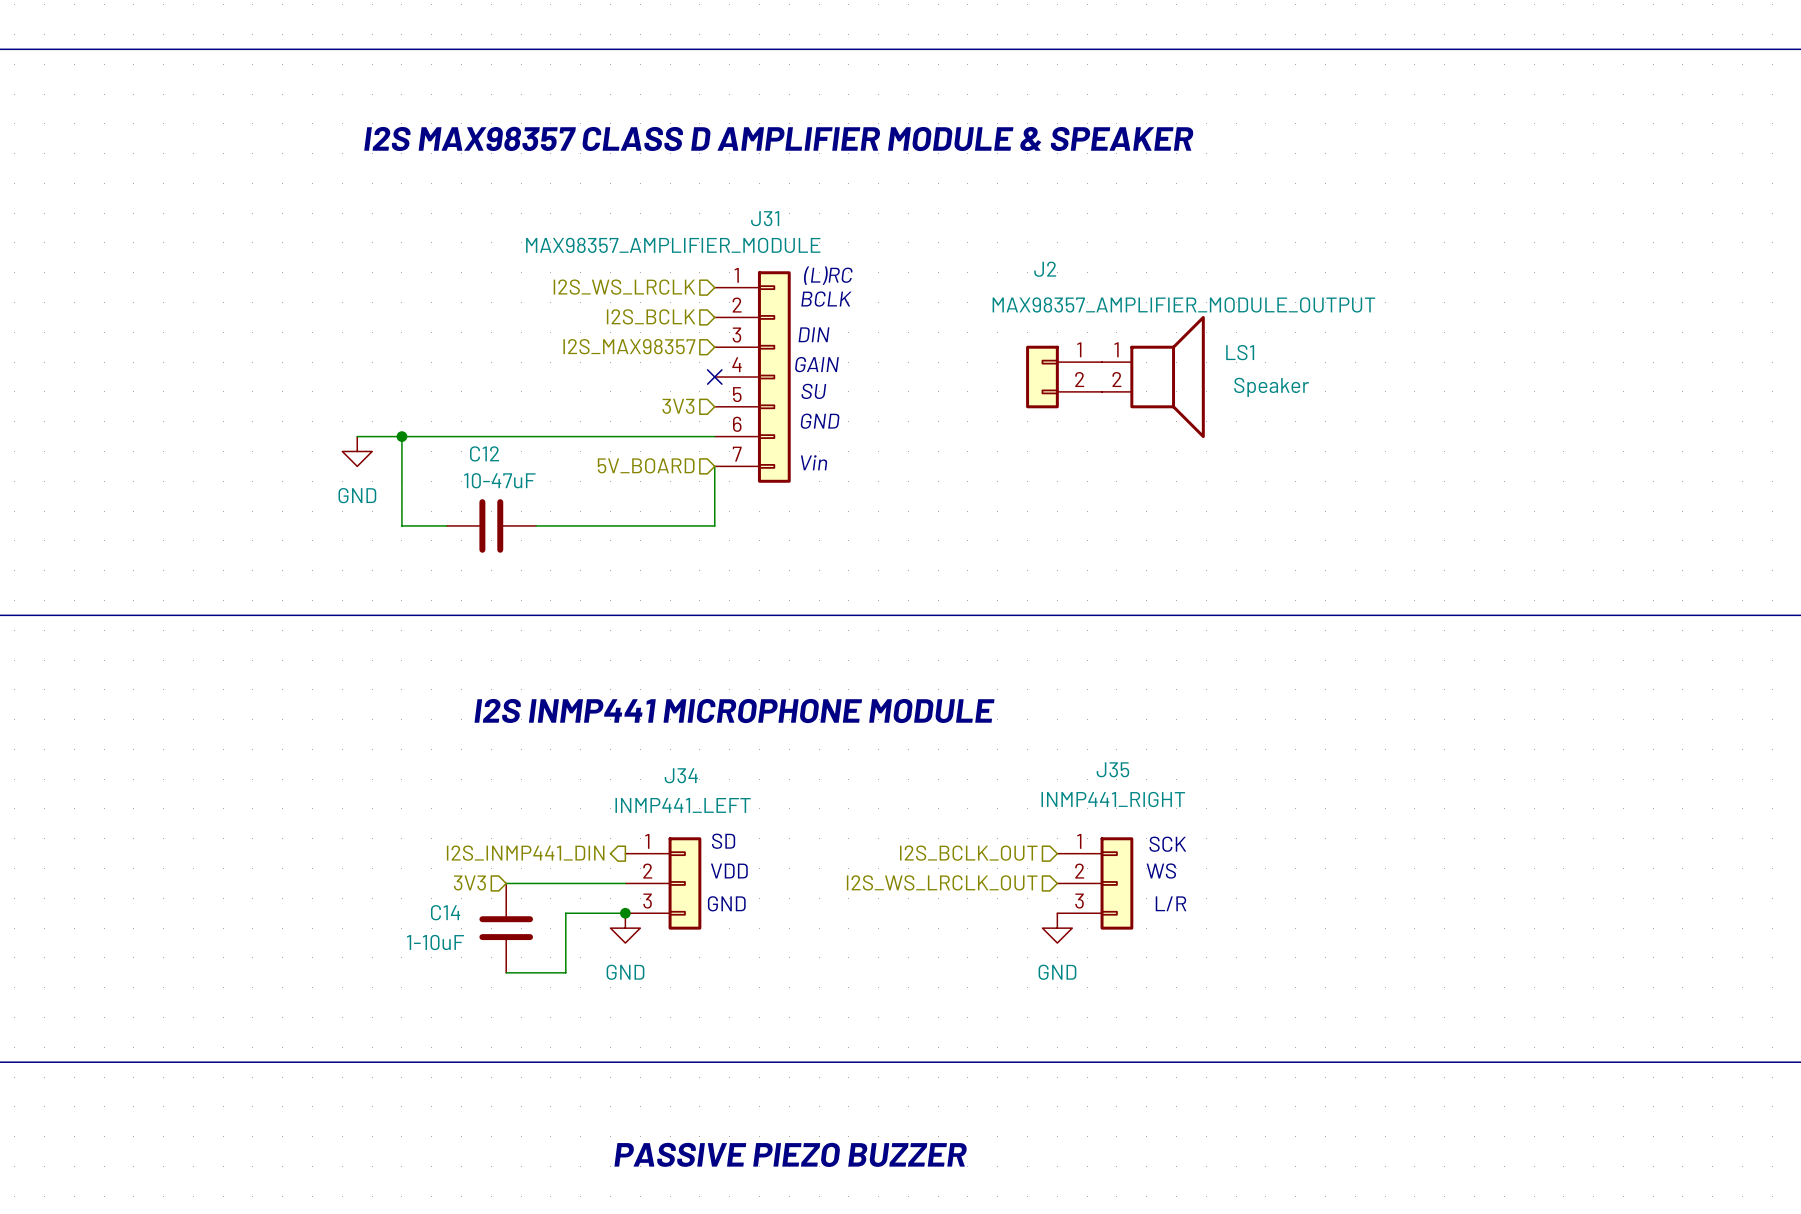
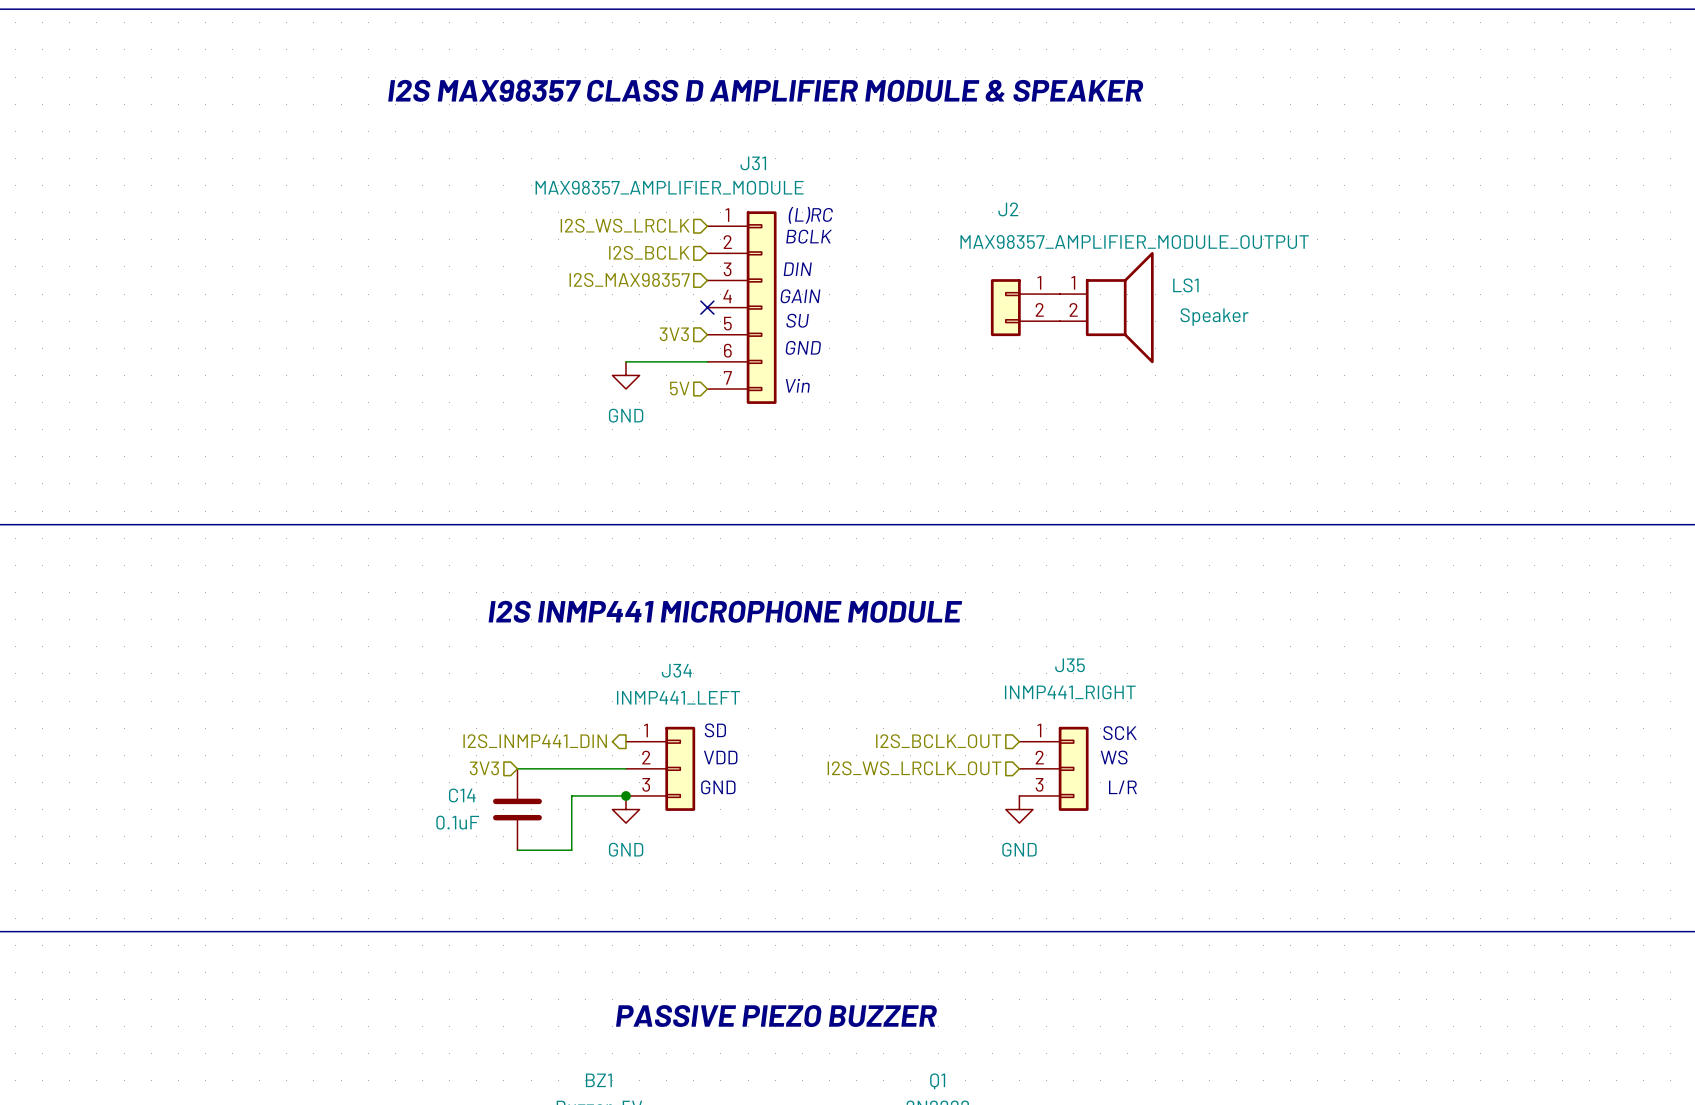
wire: (357, 436) (625, 436) -> none
wire: (401, 436) (401, 525) (446, 525) -> none
junction: (401, 436) -> none
power symbol position: GND (357, 451) -> GND (625, 375)
hierarchical label: 5V_BOARD (646, 465) -> 5V (679, 388)
wire: (714, 466) (714, 525) (536, 525) -> none
C12: 10-47uF (491, 525) -> none
C14 value: 1-10uF (435, 942) -> 0.1uF (457, 822)

